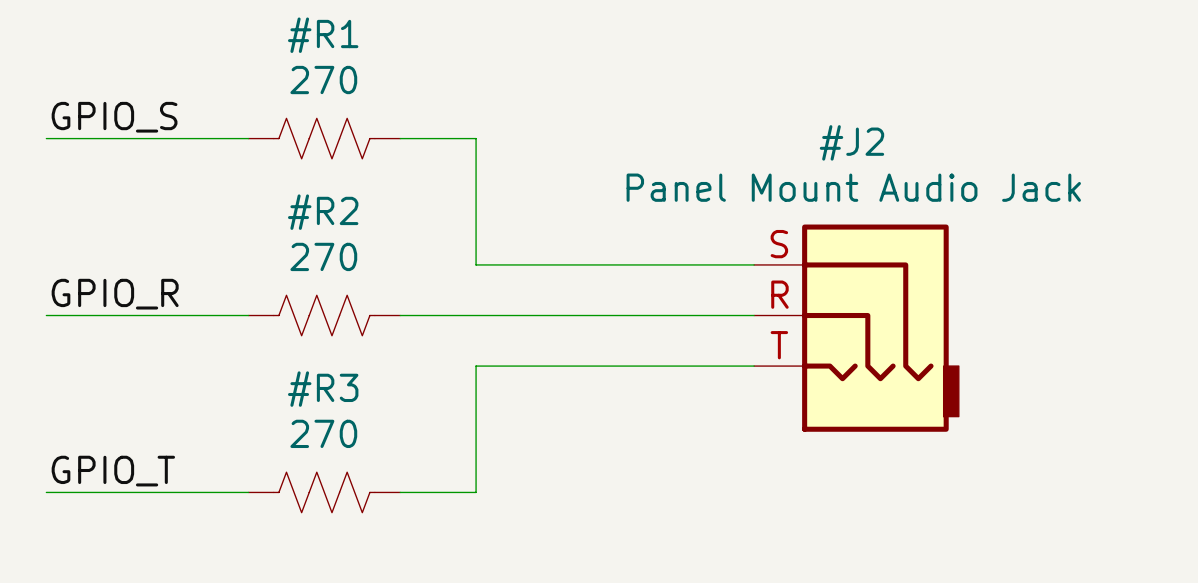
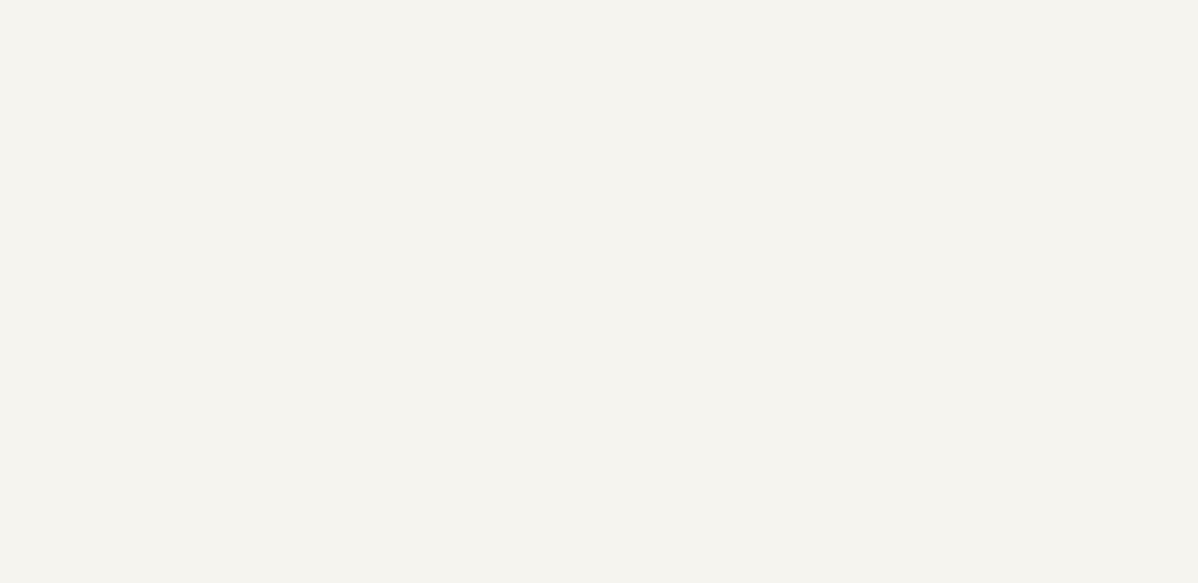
label: GPIO_S (114, 117) -> none
wire: (46, 138) (248, 138) -> none
#R1: 270 (324, 138) -> none
wire: (400, 138) (476, 138) (476, 264) (754, 264) -> none
label: GPIO_R (115, 294) -> none
wire: (46, 315) (248, 315) -> none
#R2: 270 (324, 315) -> none
wire: (400, 315) (754, 315) -> none
#J2: Panel Mount Audio Jack (856, 328) -> none
wire: (754, 366) (476, 366) (476, 492) (400, 492) -> none
label: GPIO_T (113, 471) -> none
wire: (46, 492) (248, 492) -> none
#R3: 270 (324, 492) -> none

